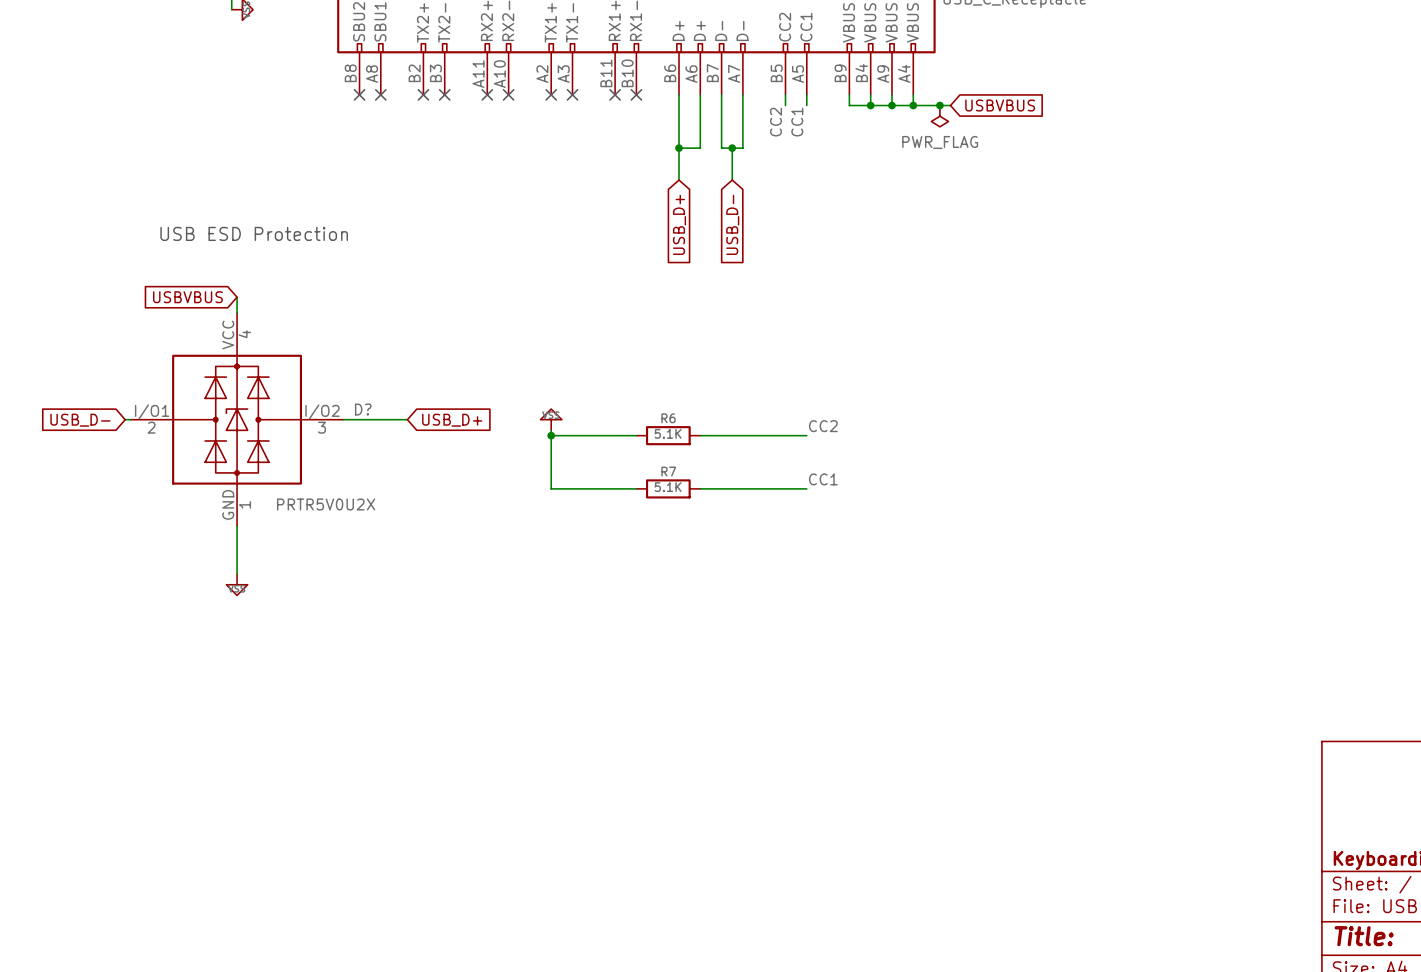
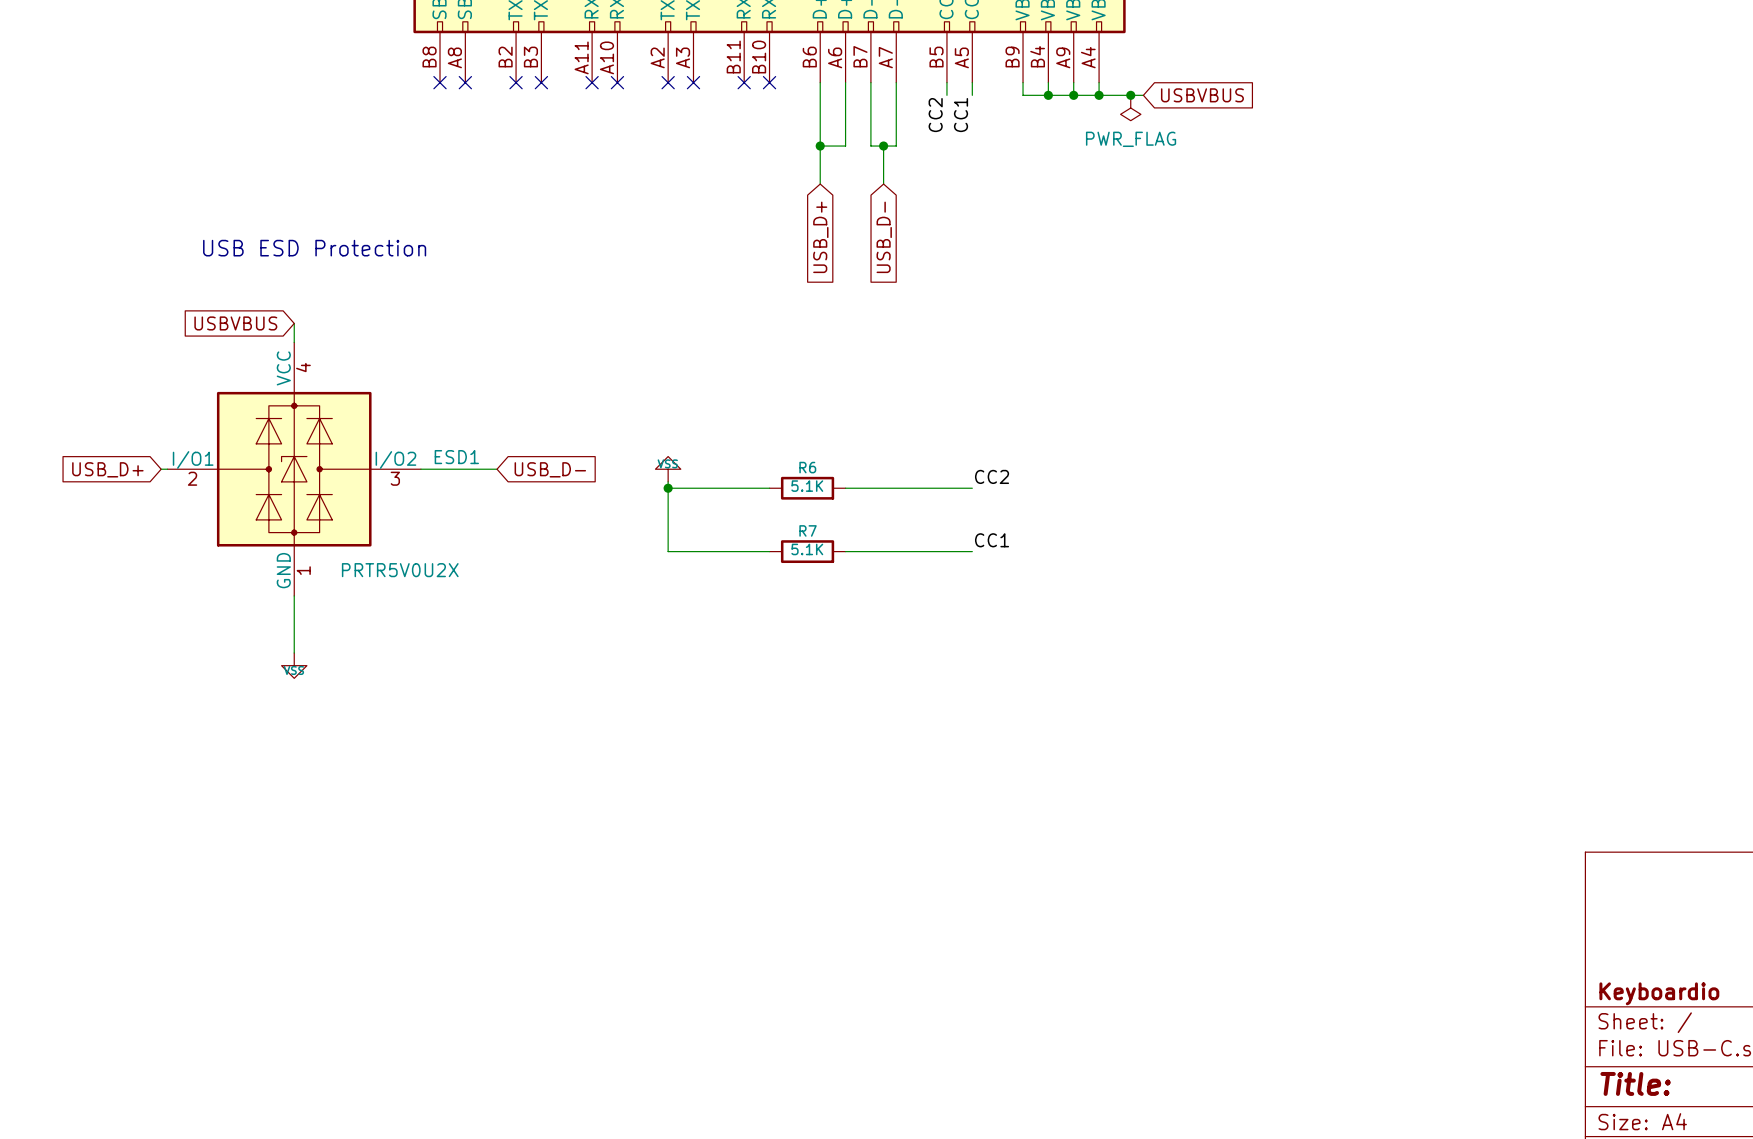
D? name: D? (363, 409) -> ESD1 (456, 457)
global label: USB_D- (80, 420) -> USB_D+ (107, 469)
global label: USB_D+ (452, 420) -> USB_D- (550, 469)

